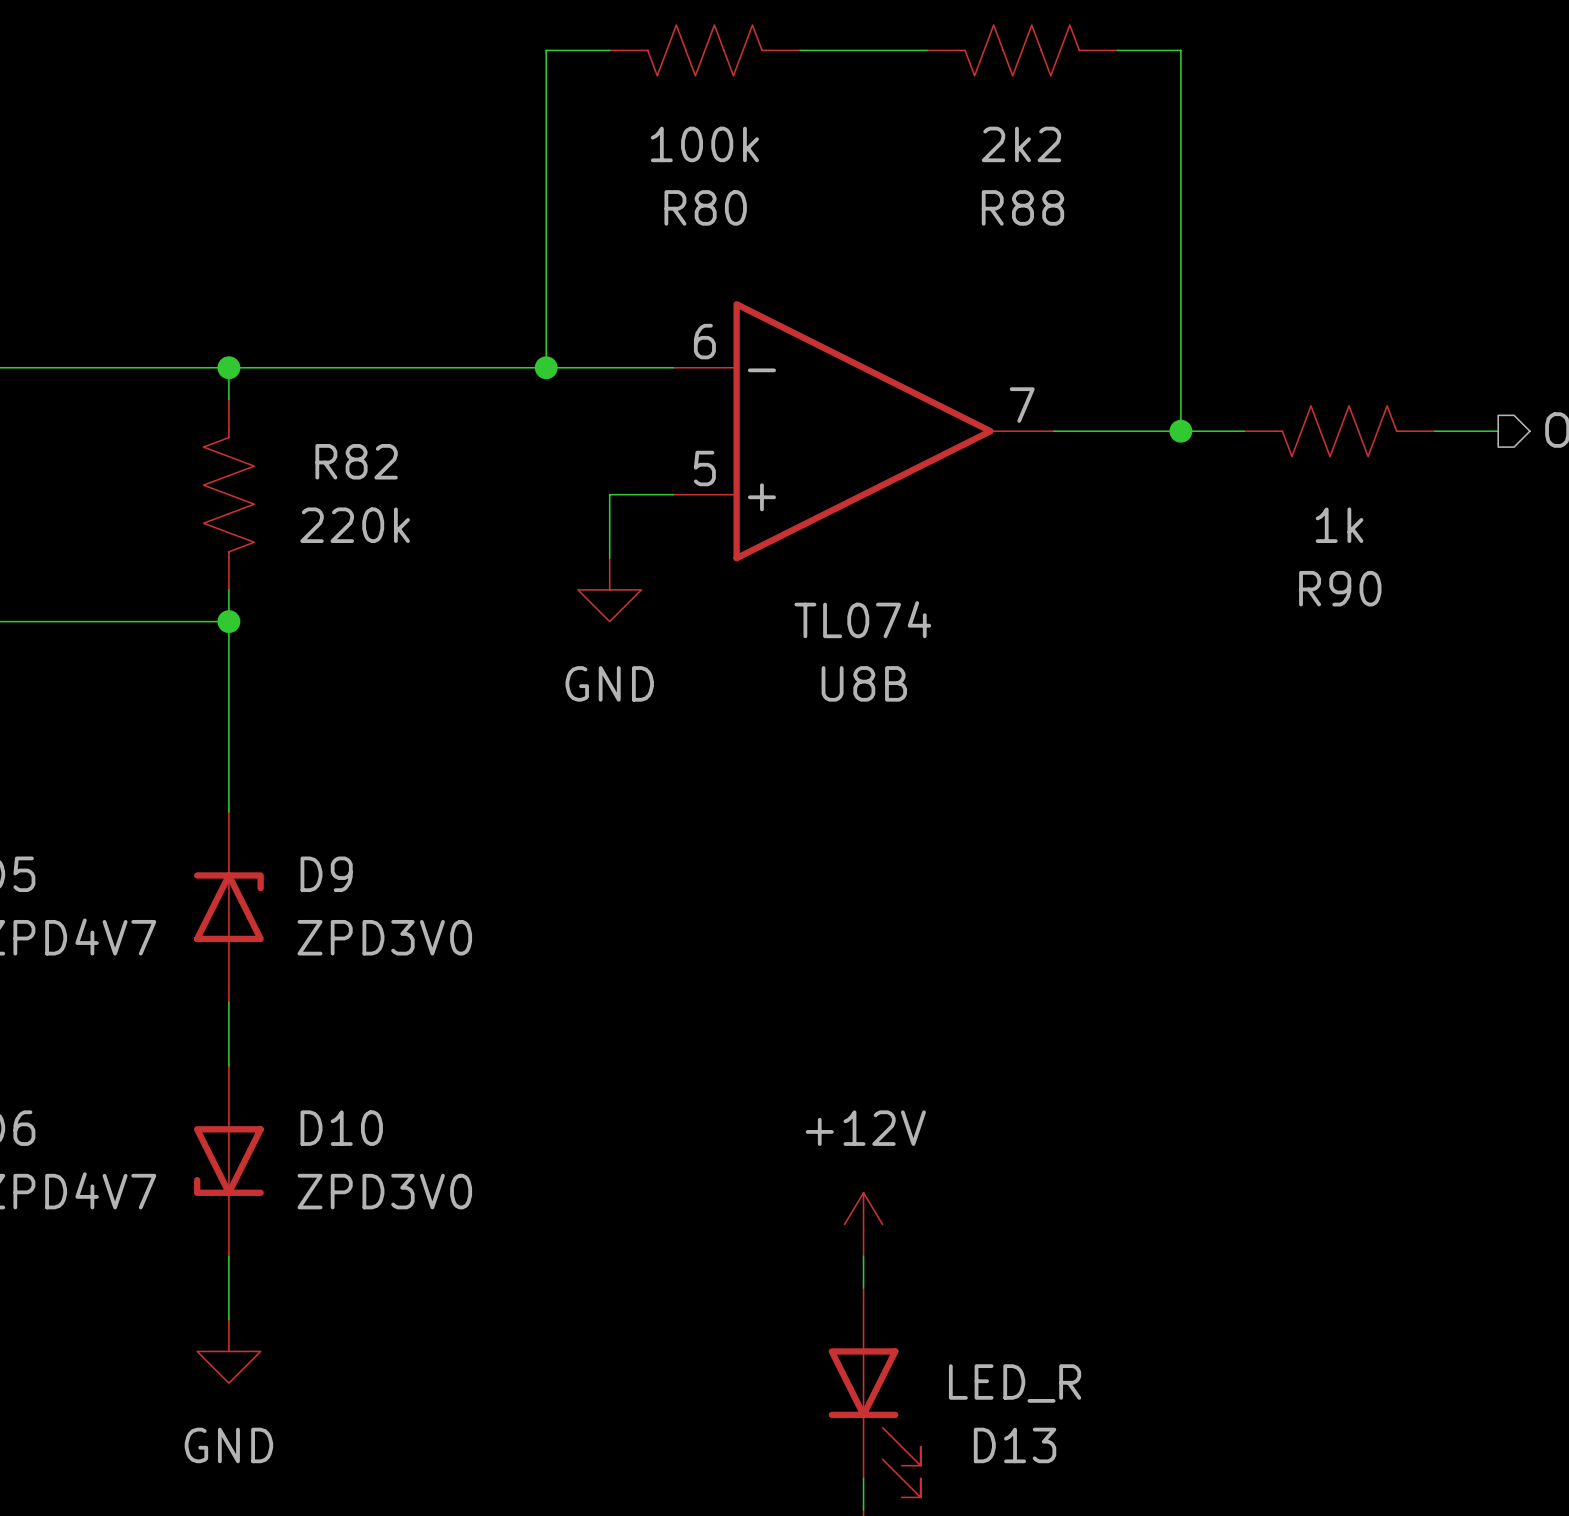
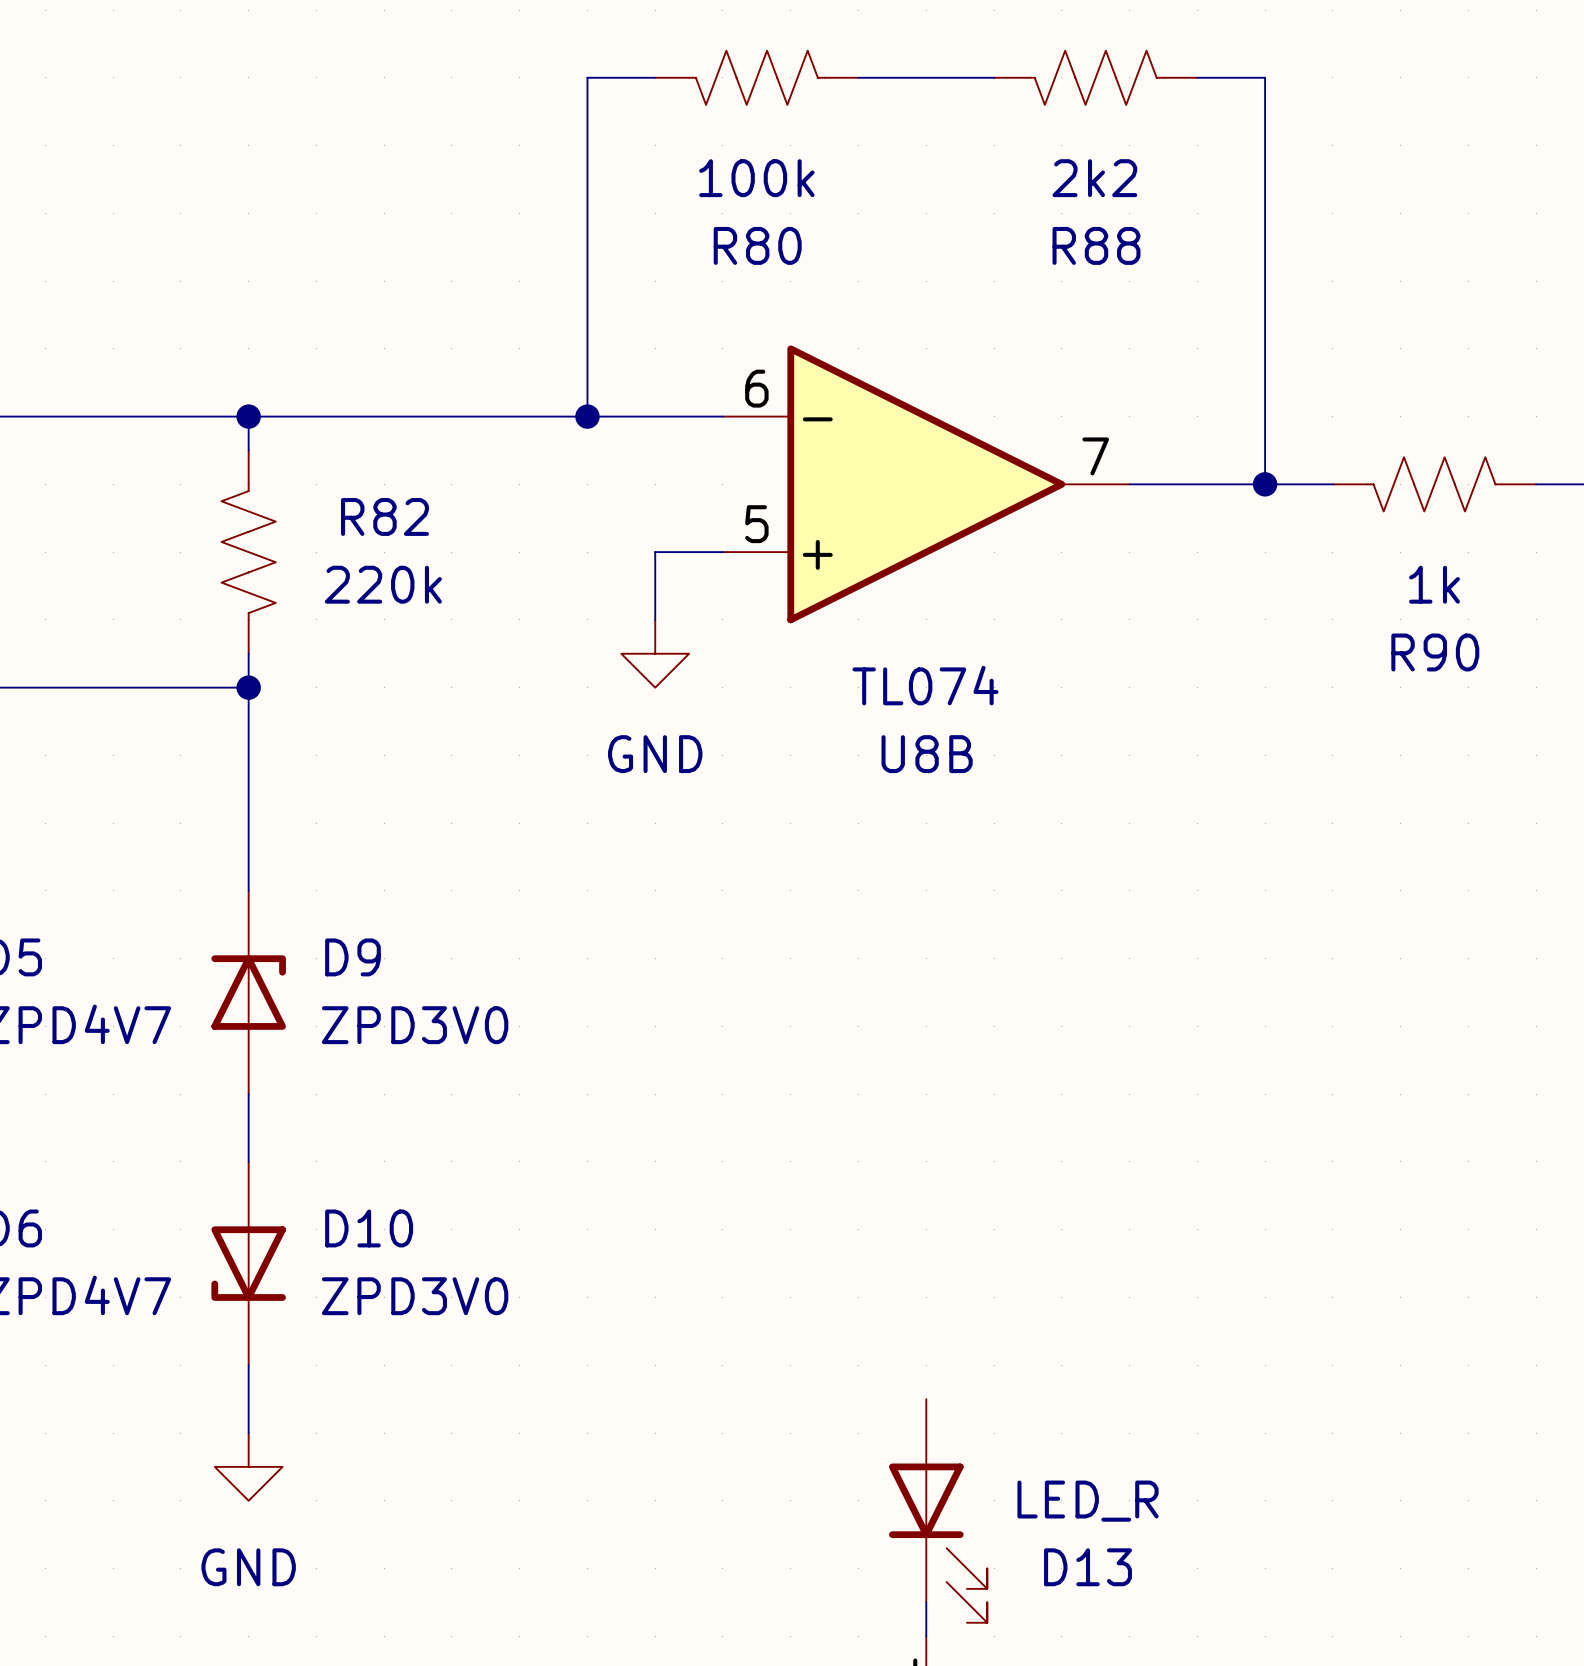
power symbol: +12V (863, 1224) -> none
wire: (863, 1256) (863, 1287) -> none

